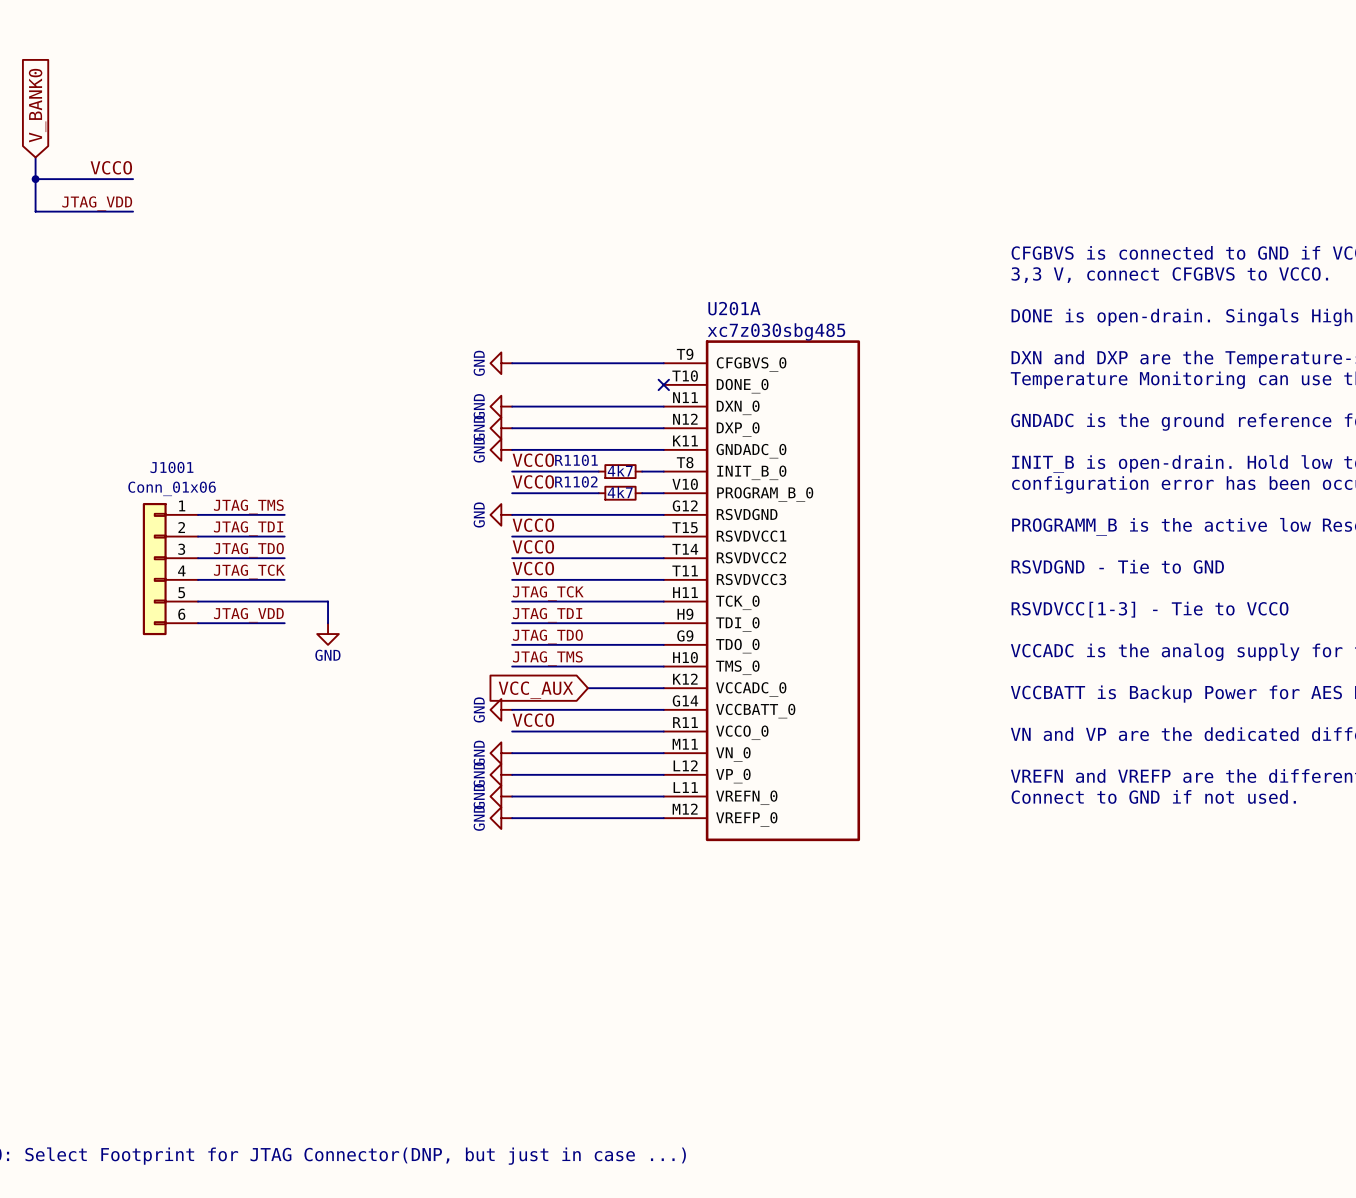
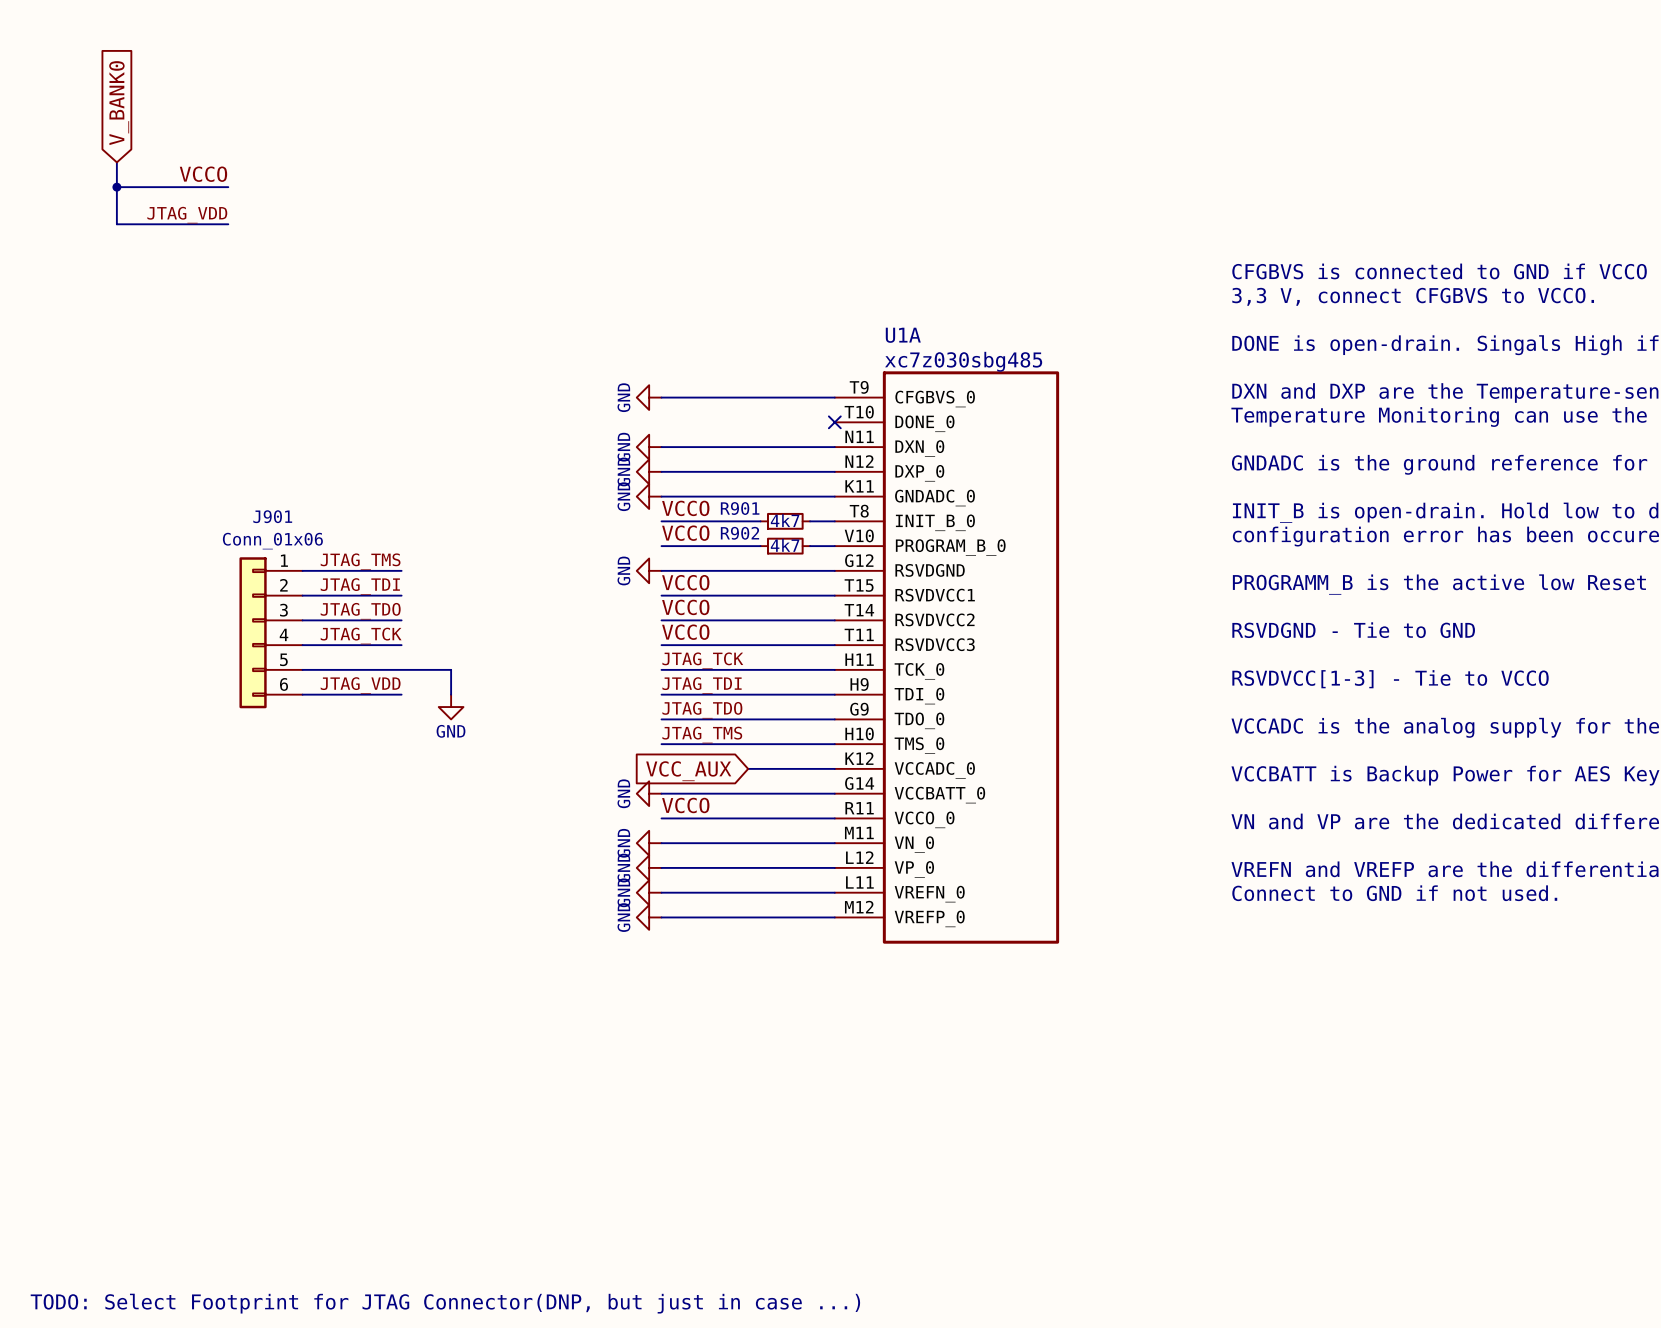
U201A name: U201A (734, 308) -> U1A (903, 335)
R1101 name: R1101 (576, 460) -> R901 (740, 508)
J1001 name: J1001 (171, 467) -> J901 (272, 516)
R1102 name: R1102 (576, 482) -> R902 (739, 533)

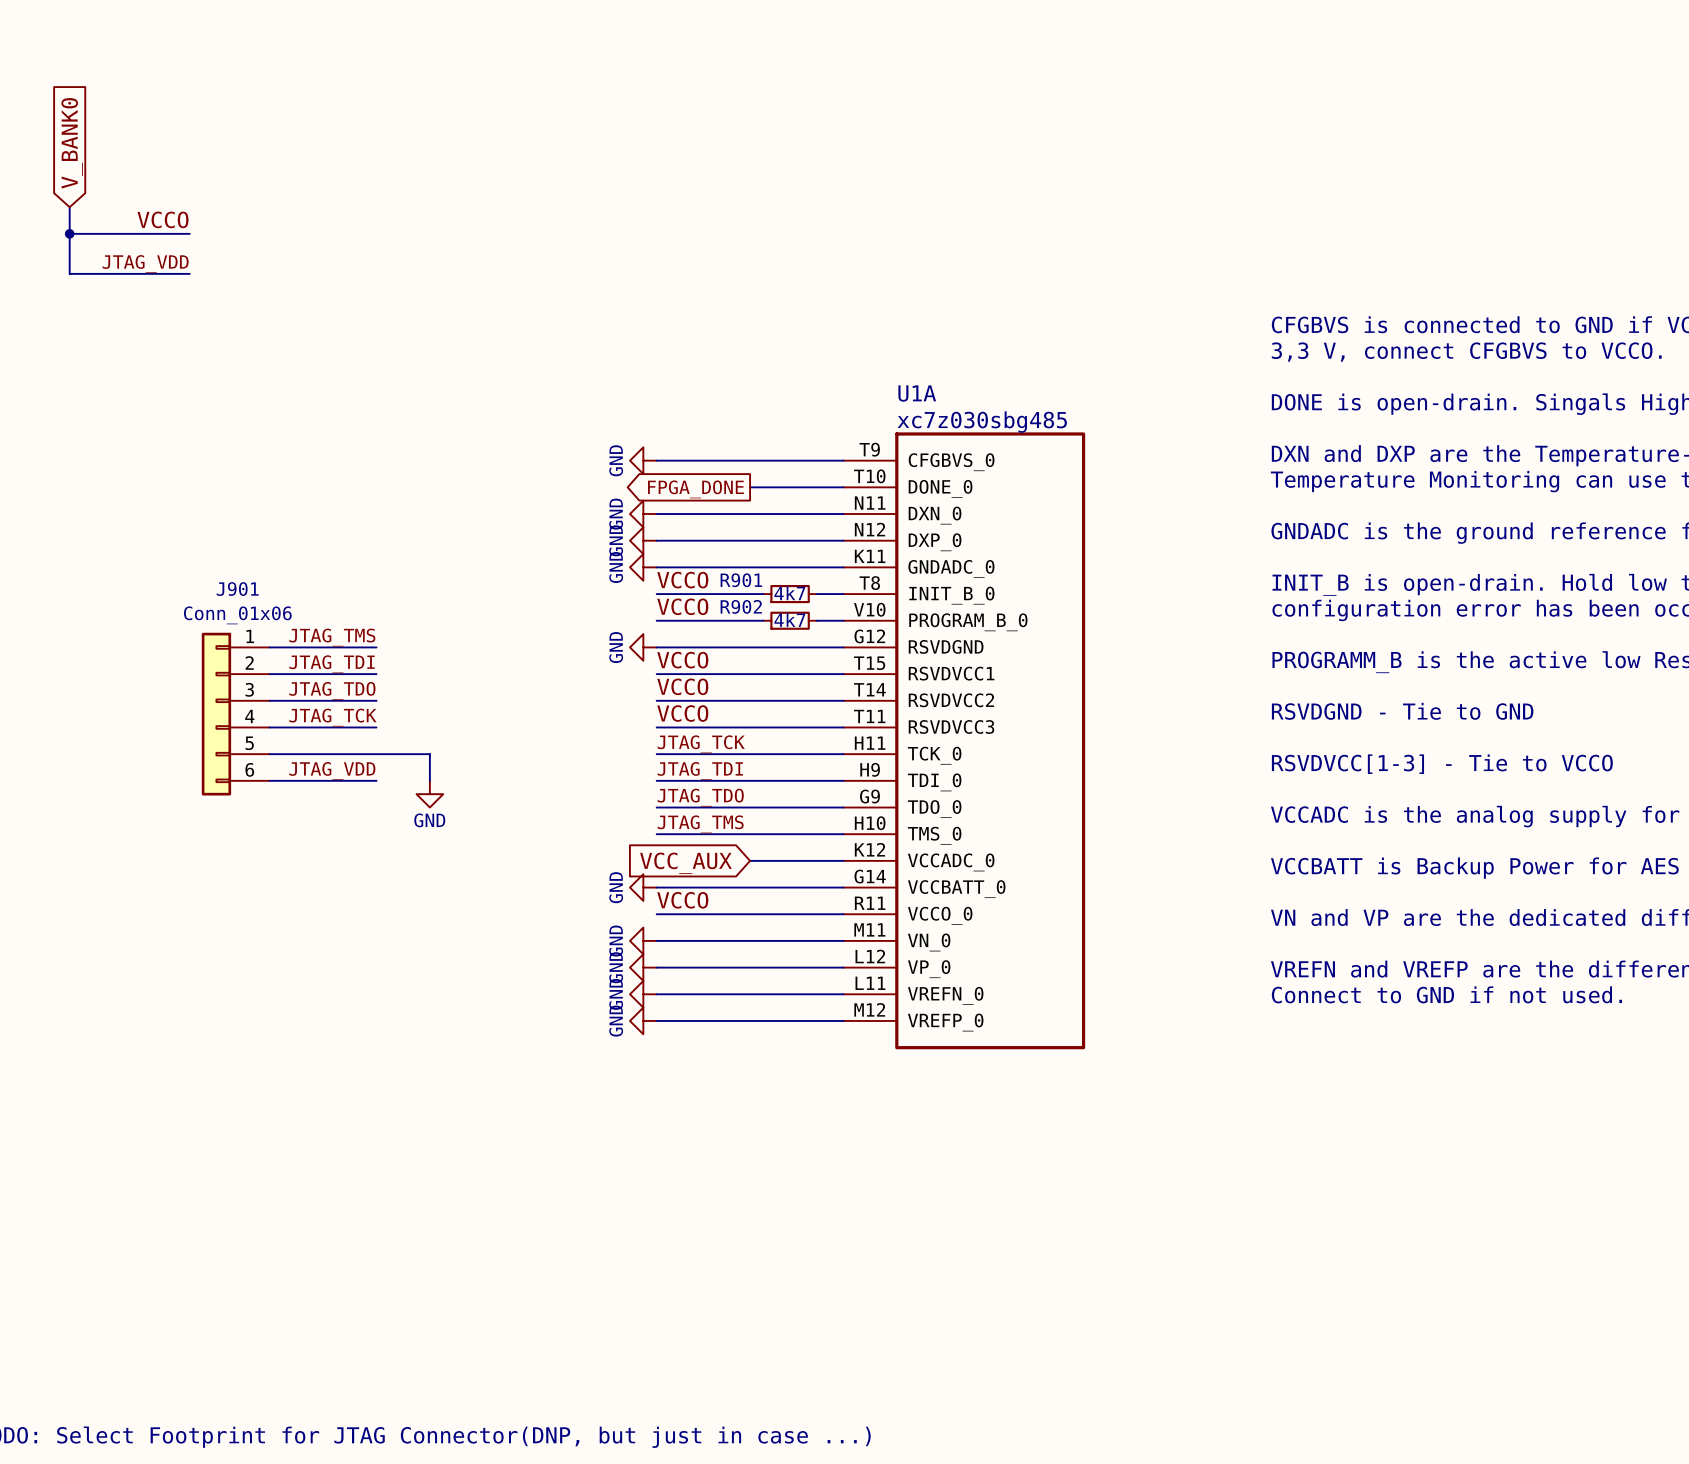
wire: none -> (750, 487) (843, 487)
no-connect mark: (834, 422) -> none
global label: none -> FPGA_DONE (695, 489)

